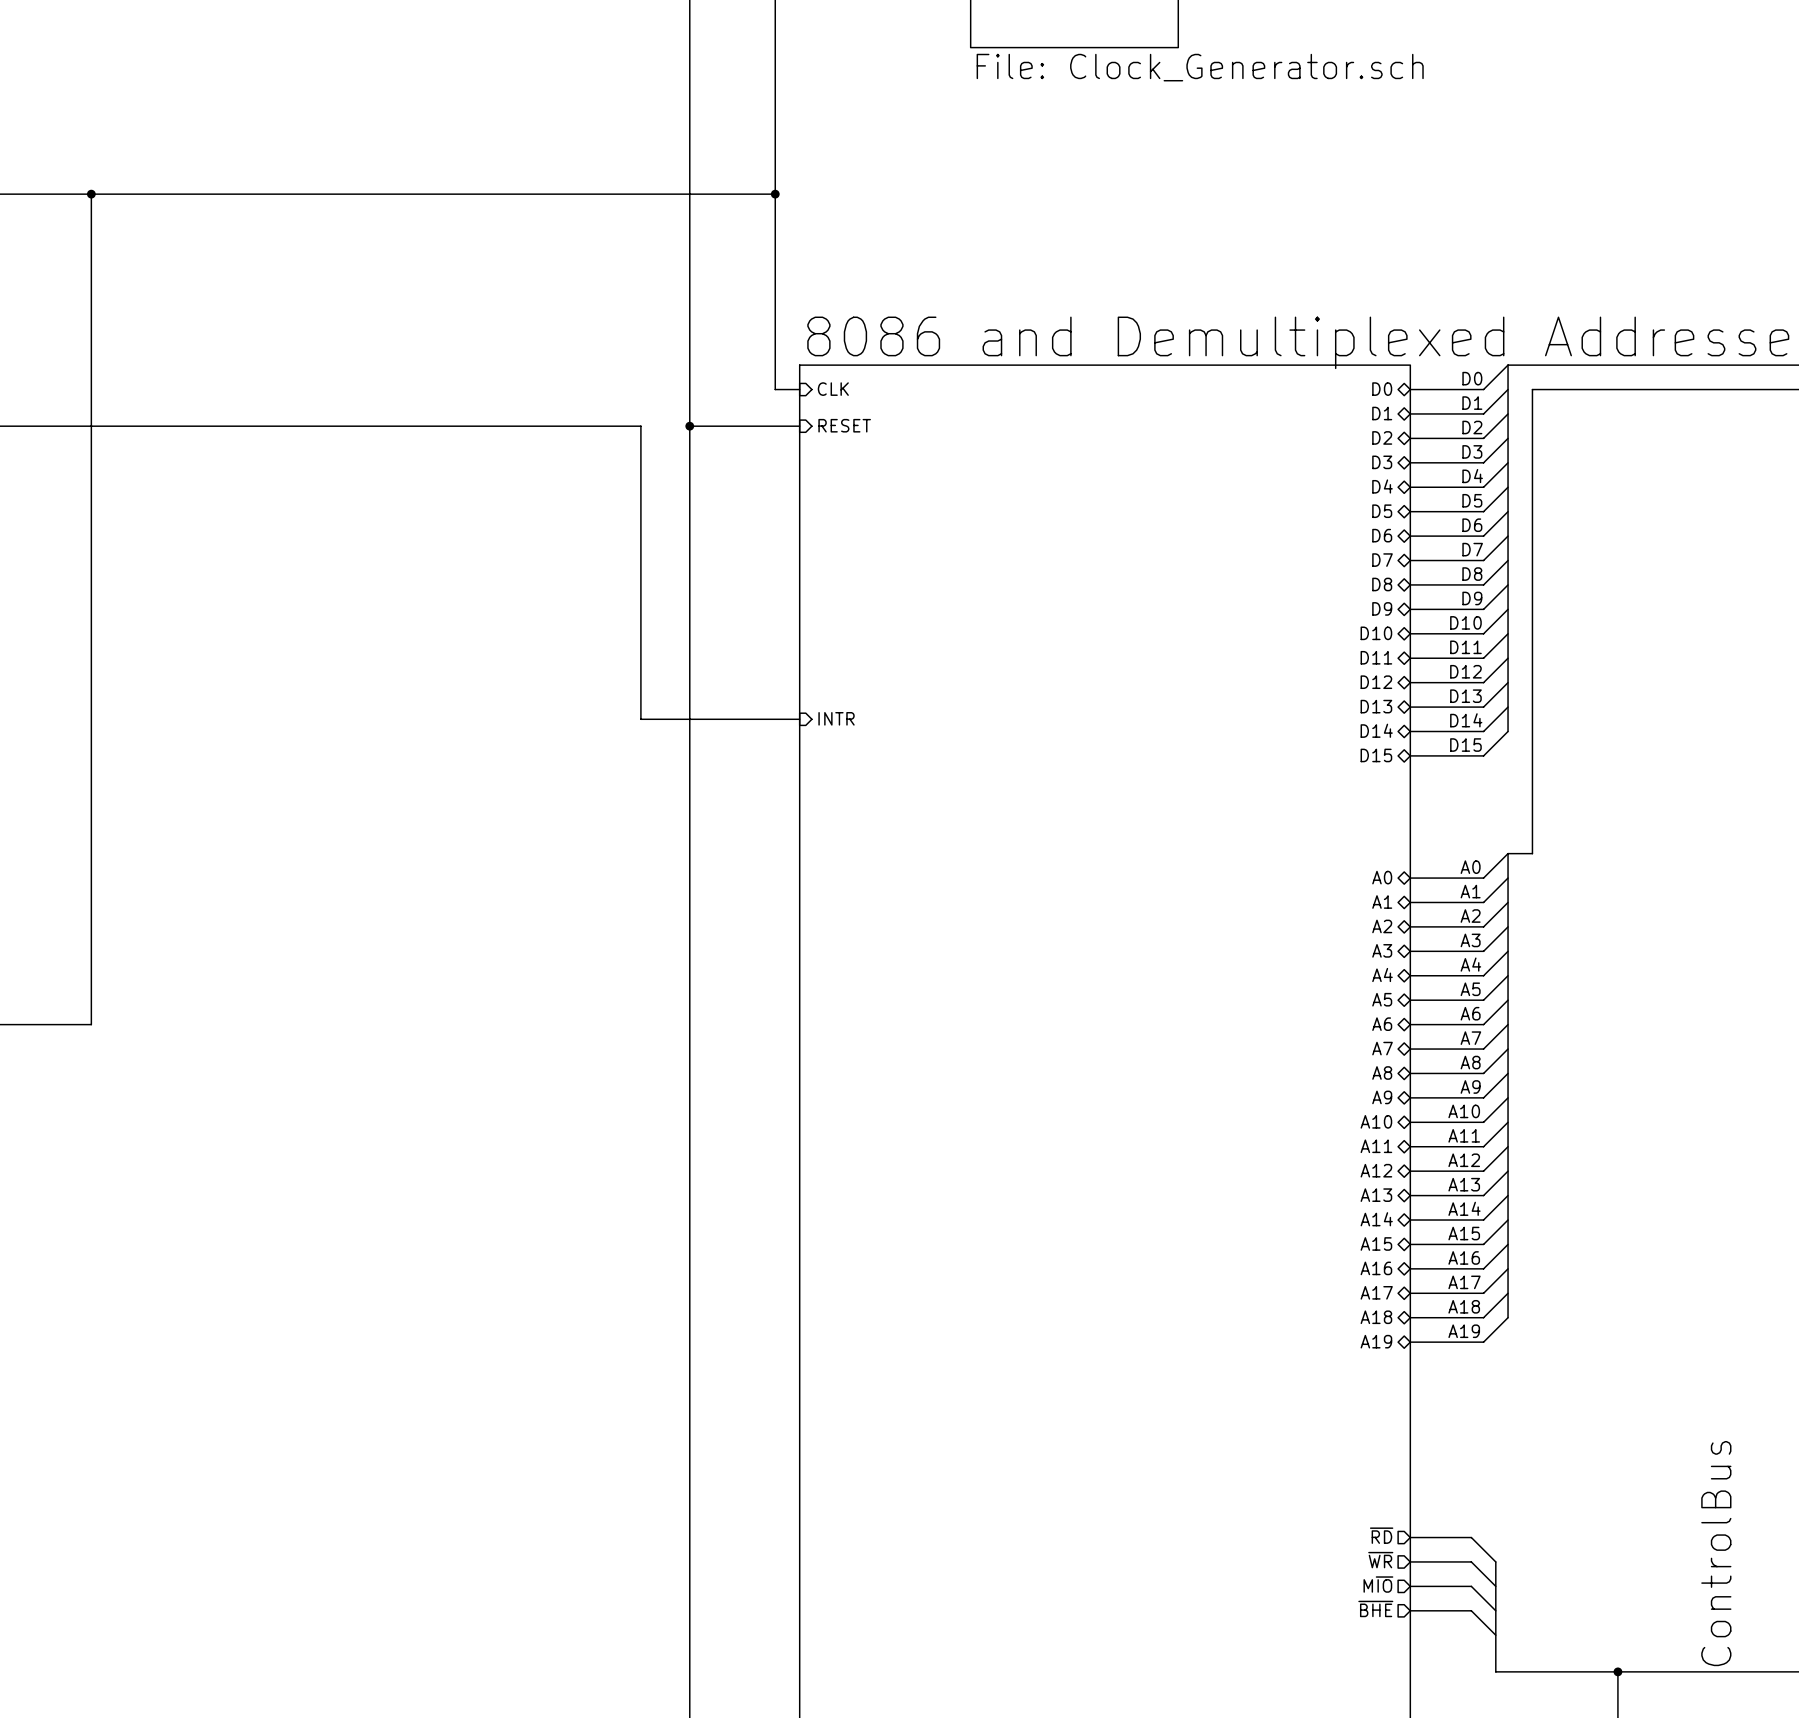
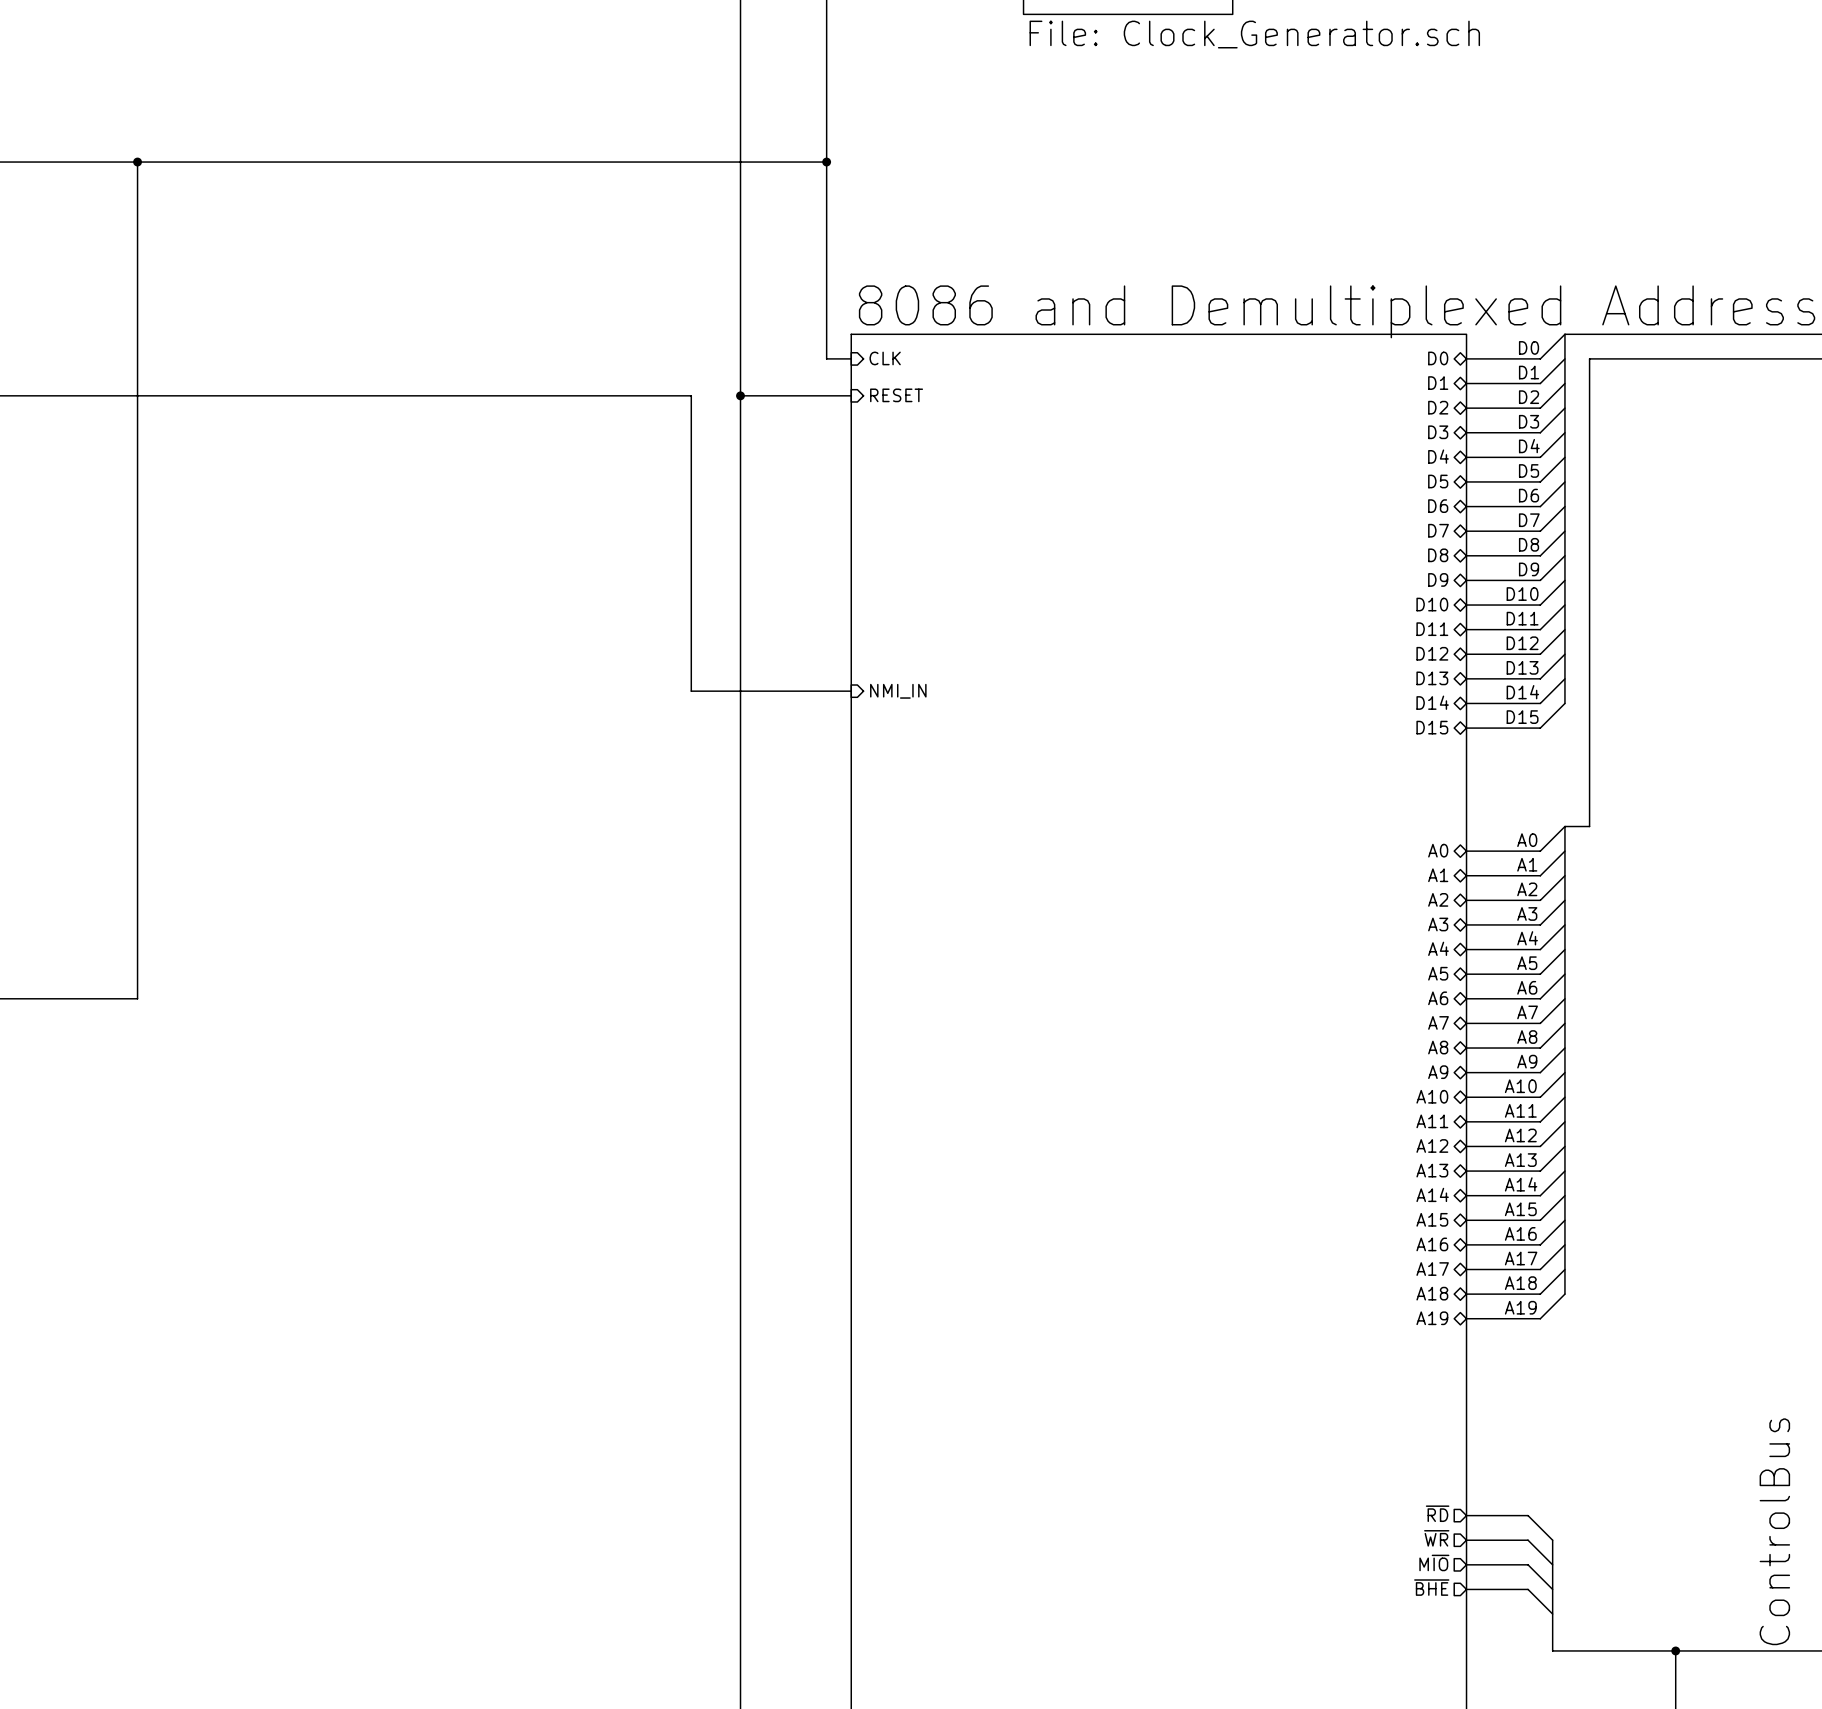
sheet pin: INTR (836, 718) -> NMI_IN (898, 691)

